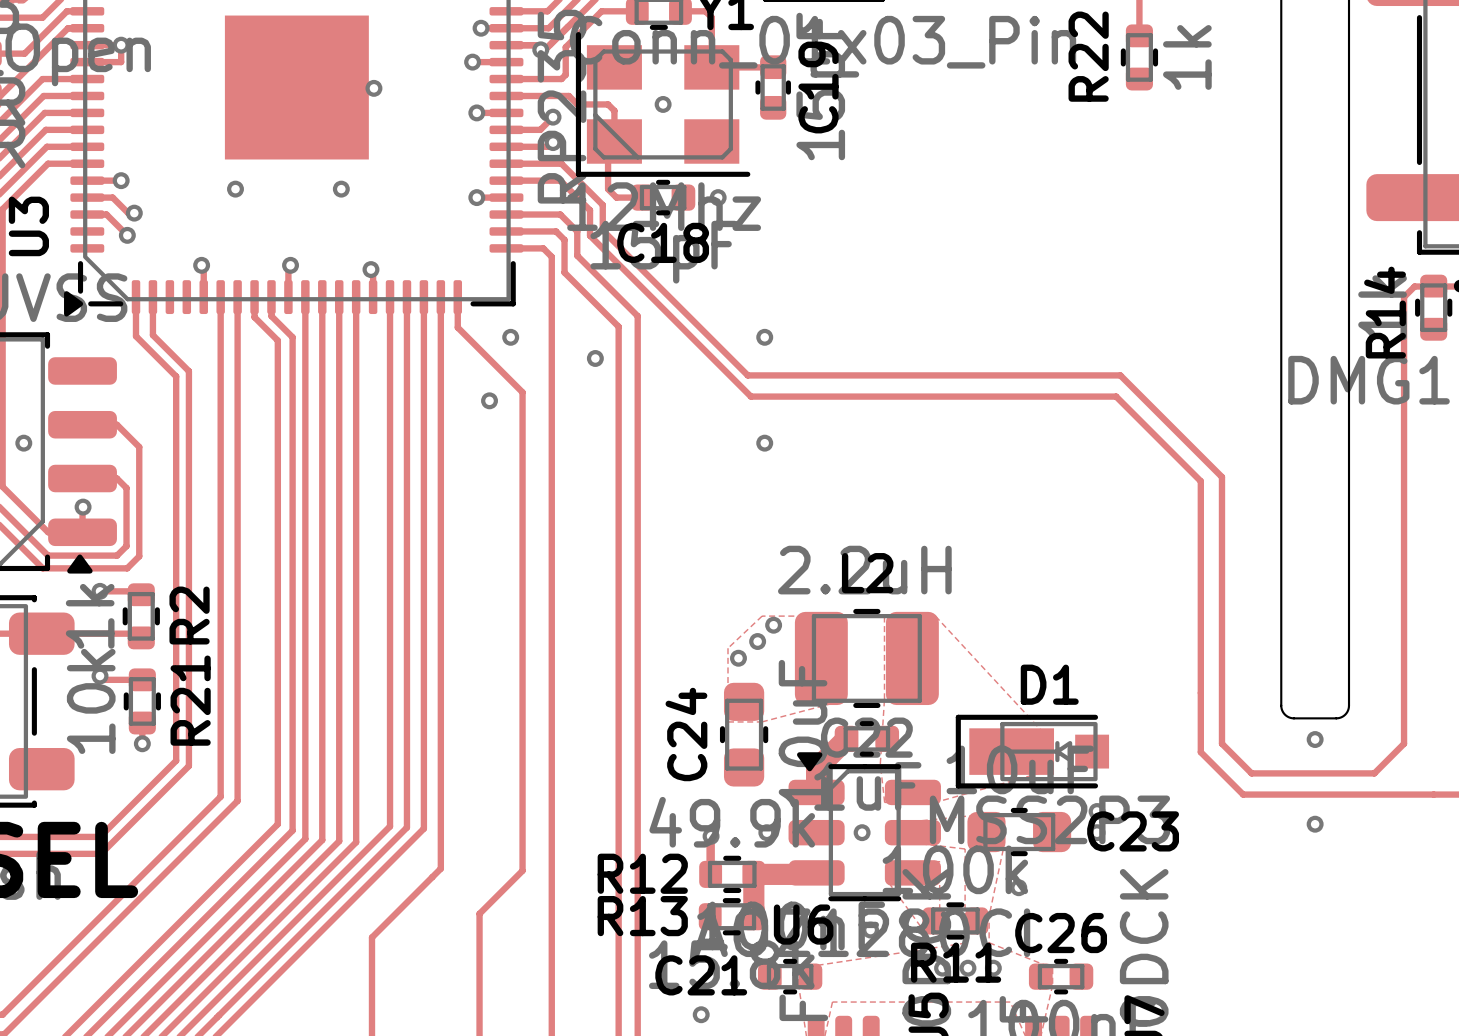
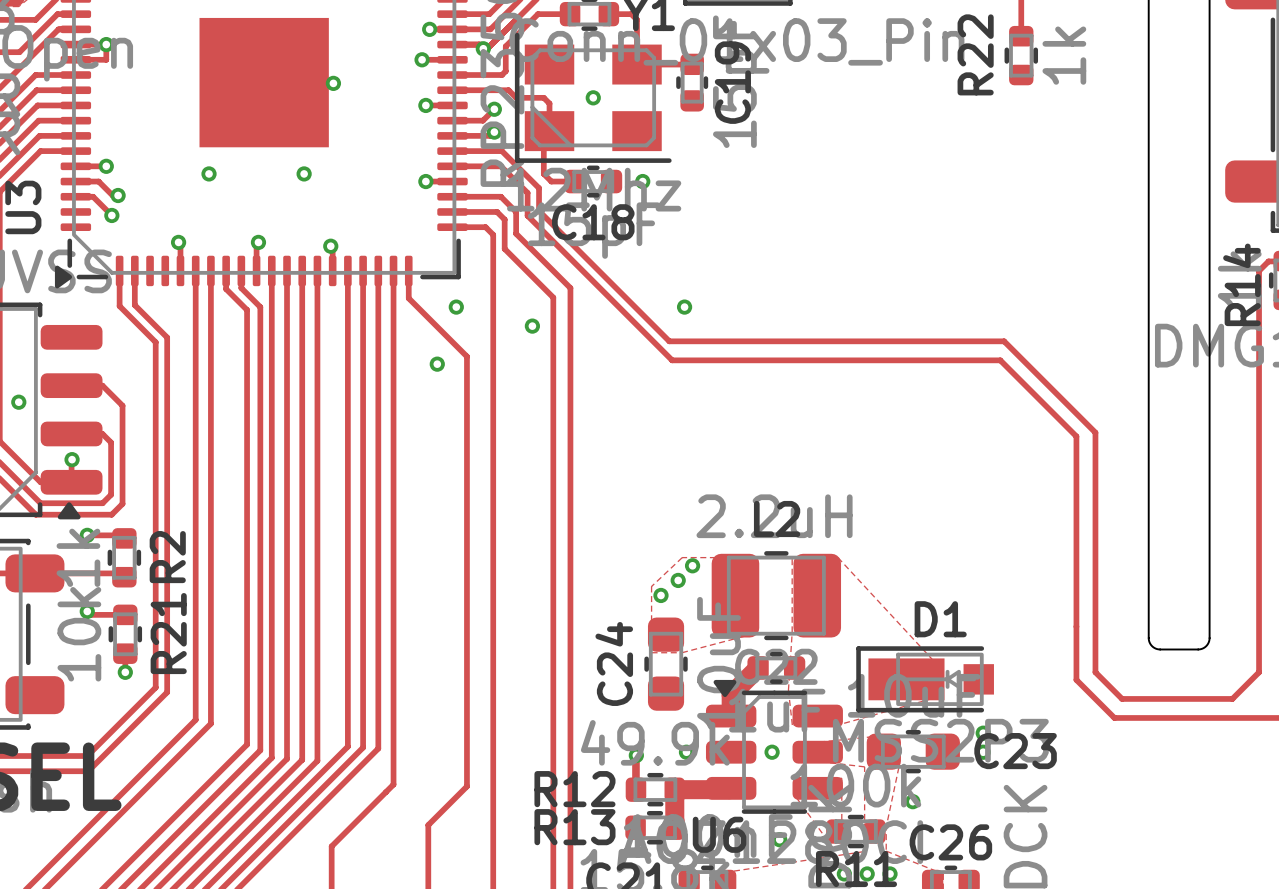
via: (764, 443) -> none
via: (1315, 739) -> none
via: (1315, 824) -> none

